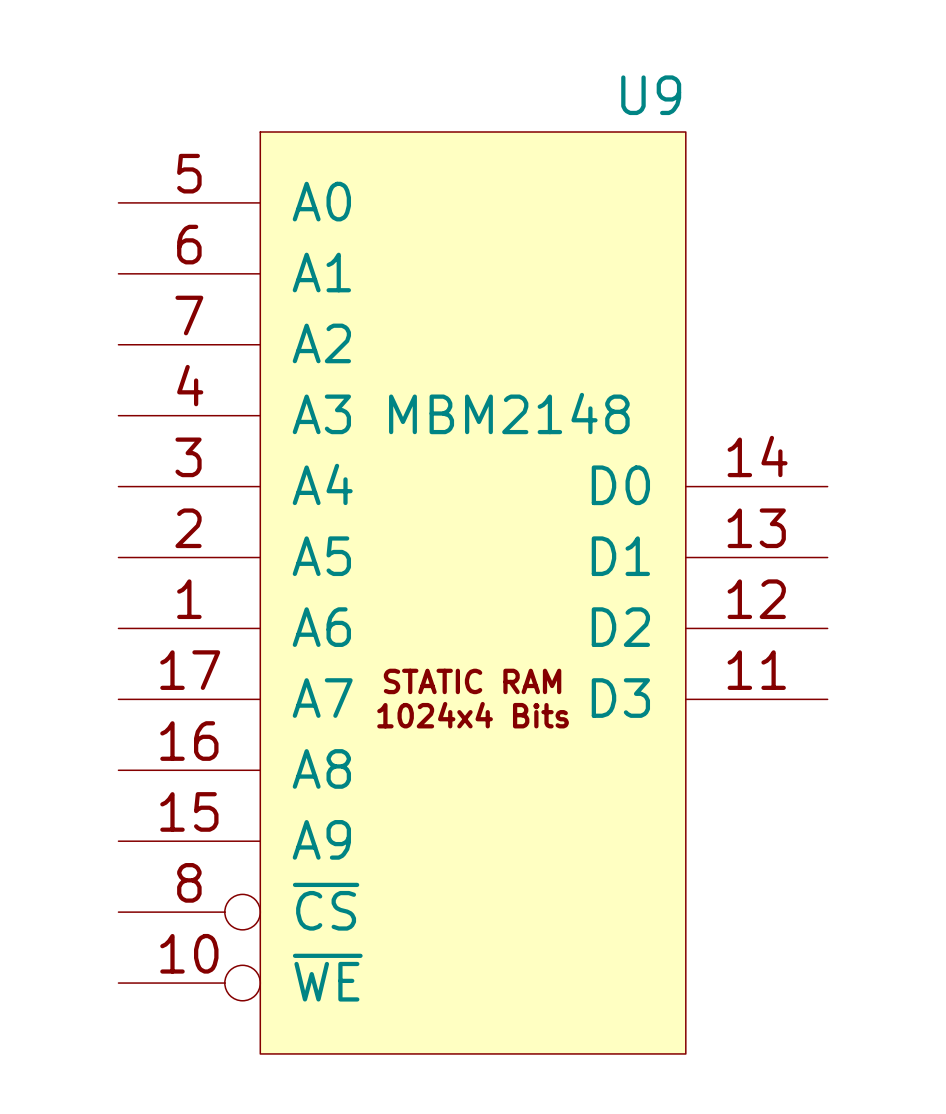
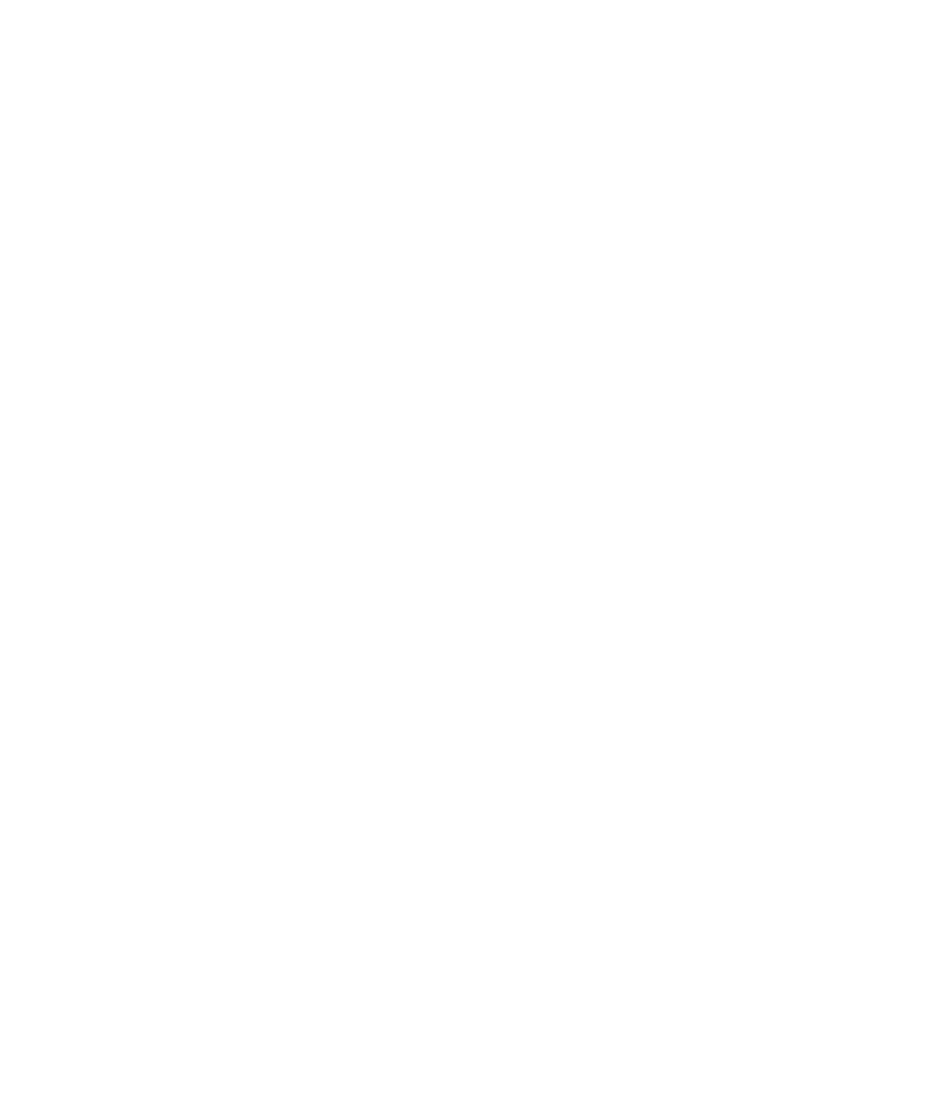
U9: MBM2148 (473, 592) -> none

